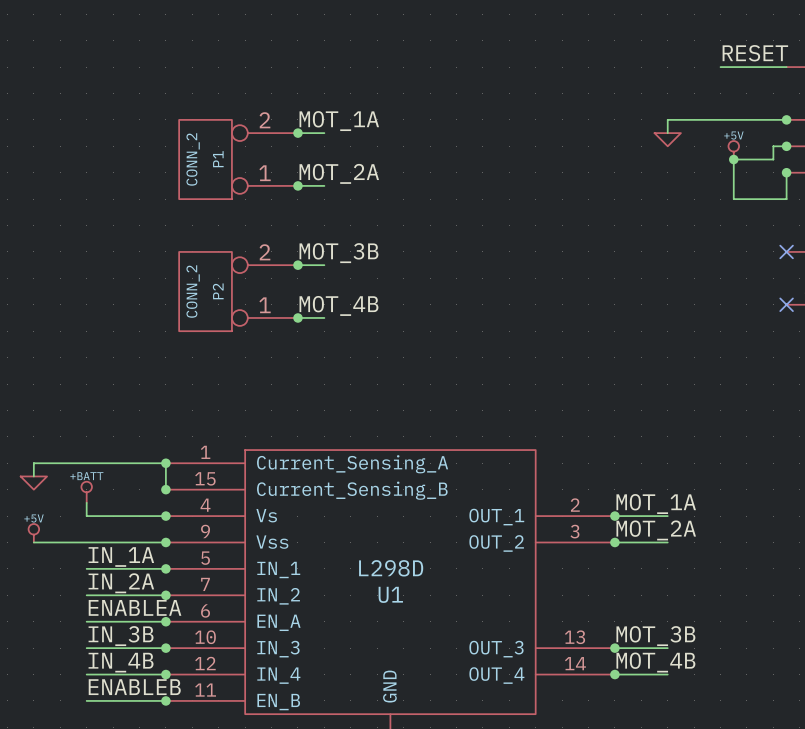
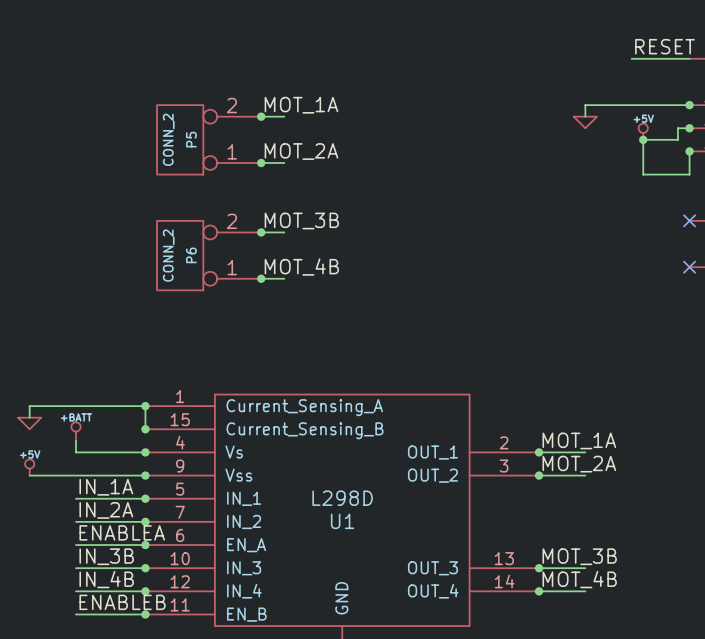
P1 name: P1 (218, 159) -> P5 (191, 139)
P2 name: P2 (218, 291) -> P6 (191, 255)

